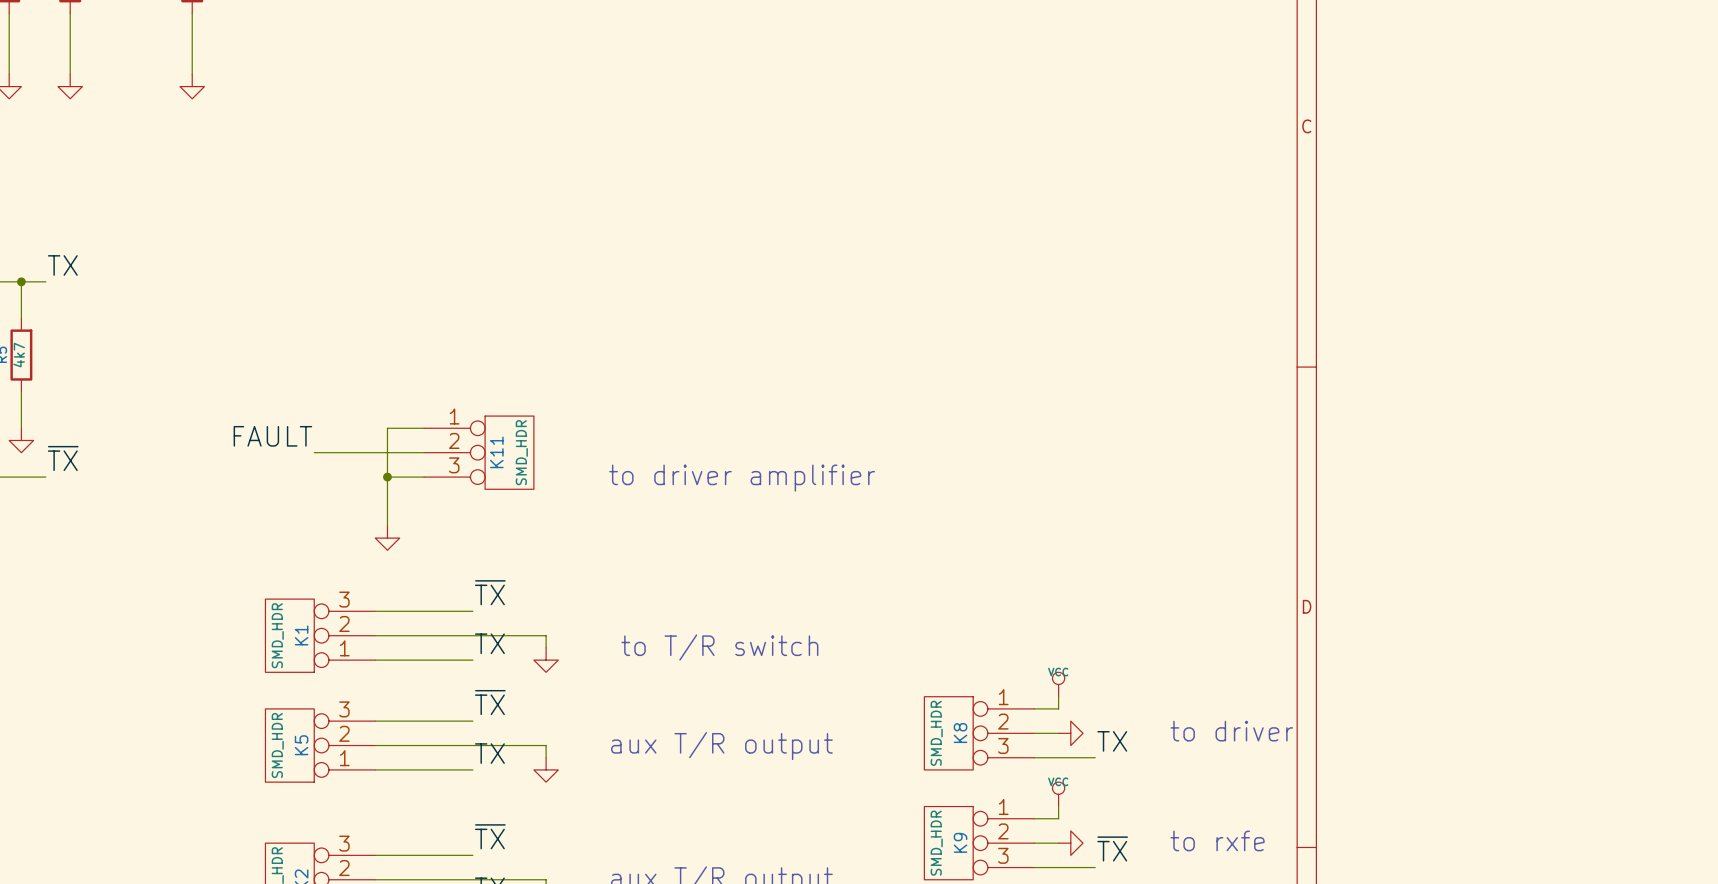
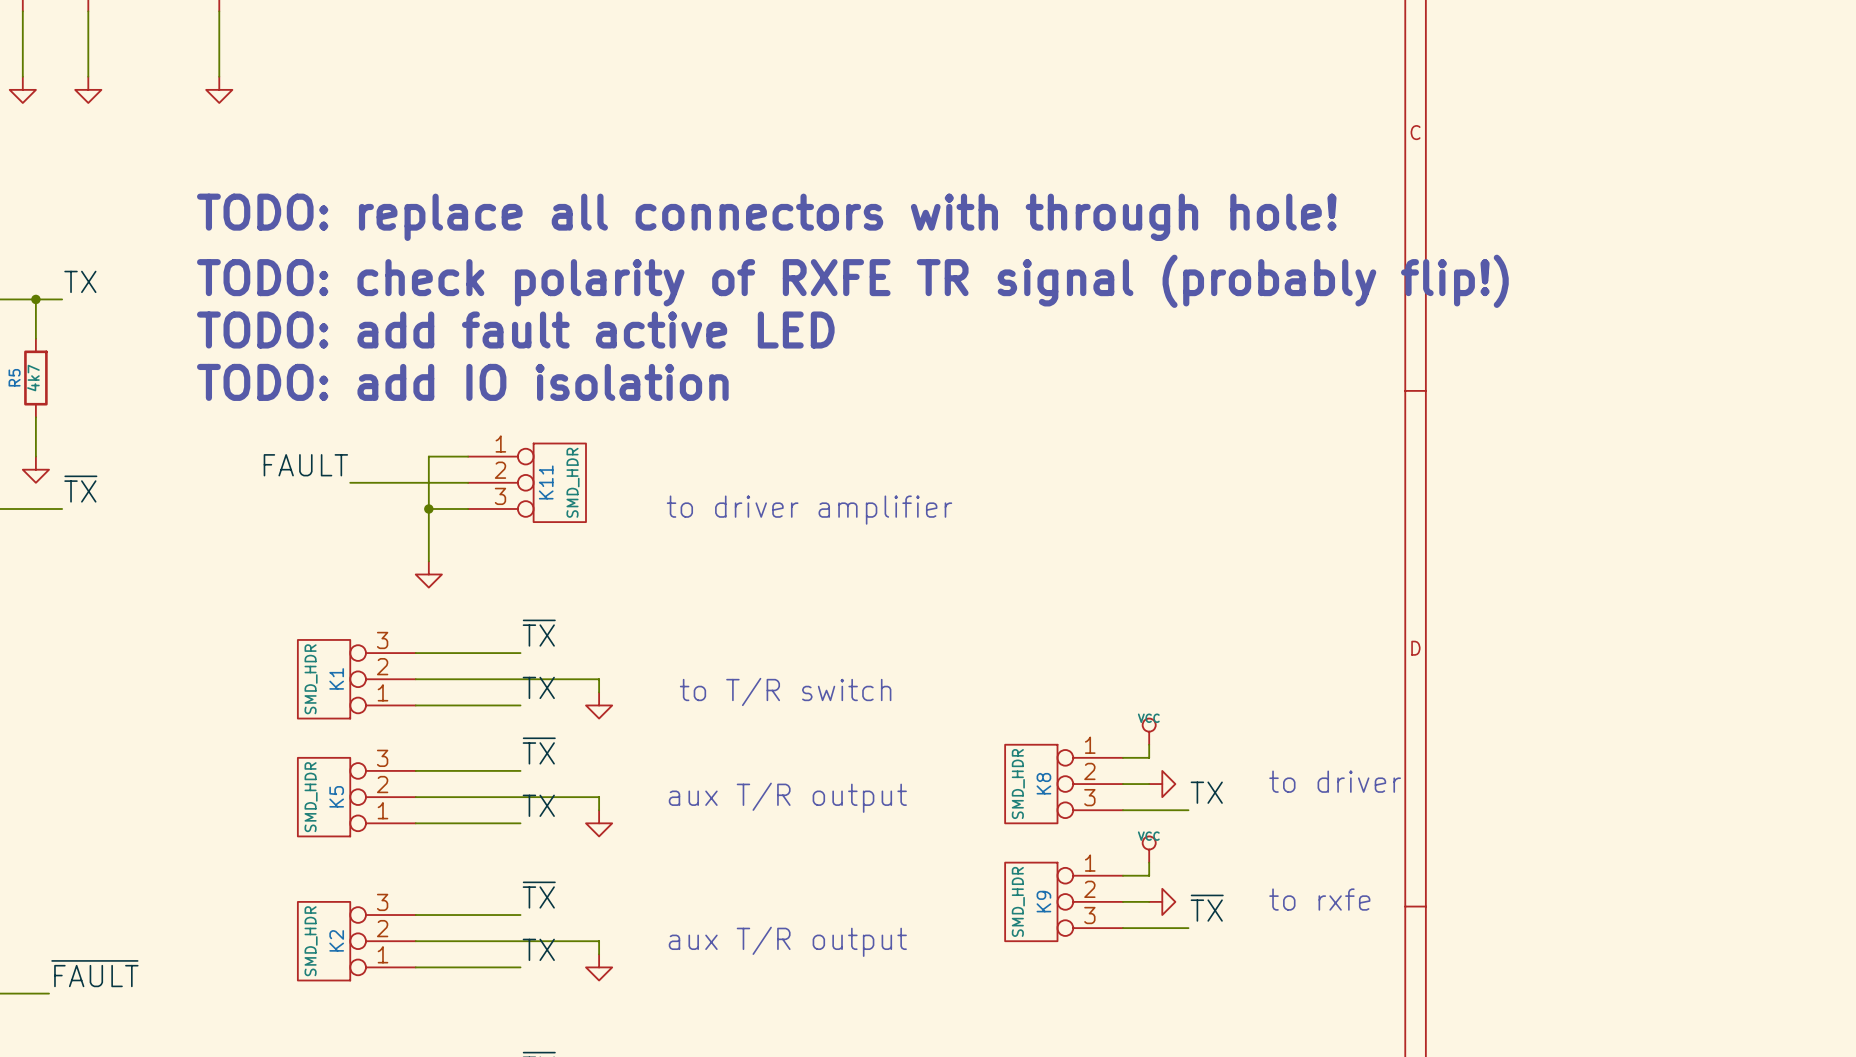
text: none -> TODO: replace all connectors with through hole! (766, 217)
text: none -> TODO: check polarity of RXFE TR signal (probably flip!) (852, 281)
text: none -> TODO: add fault active LED (515, 330)
text: none -> TODO: add IO isolation (462, 382)

